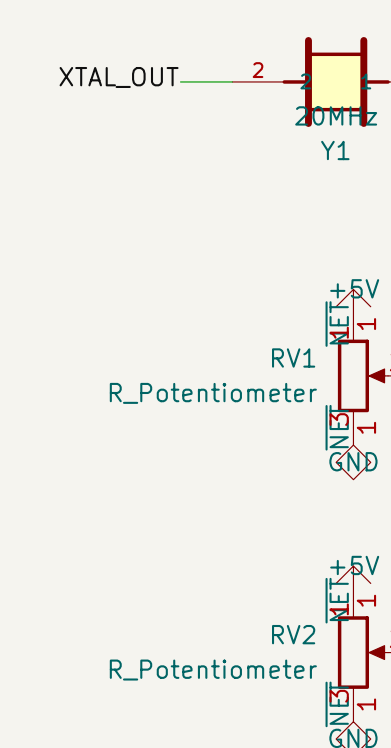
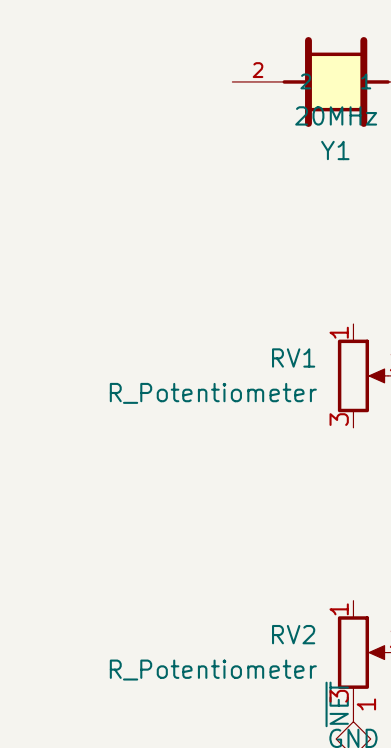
label: XTAL_OUT (119, 77) -> none
wire: (180, 81) (232, 81) -> none
power symbol: +5V (353, 306) -> none
power symbol: GND (353, 453) -> none
power symbol: +5V (353, 583) -> none

